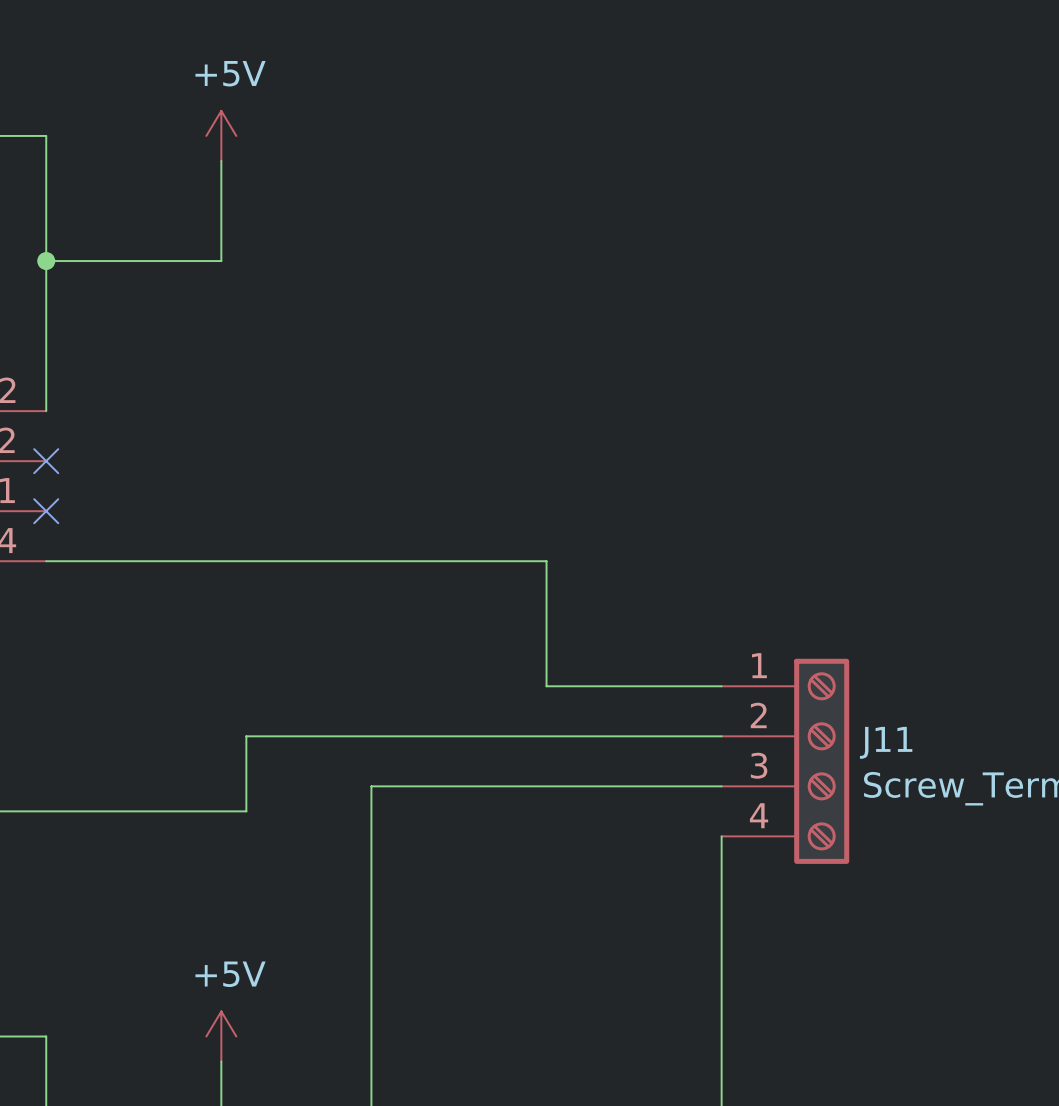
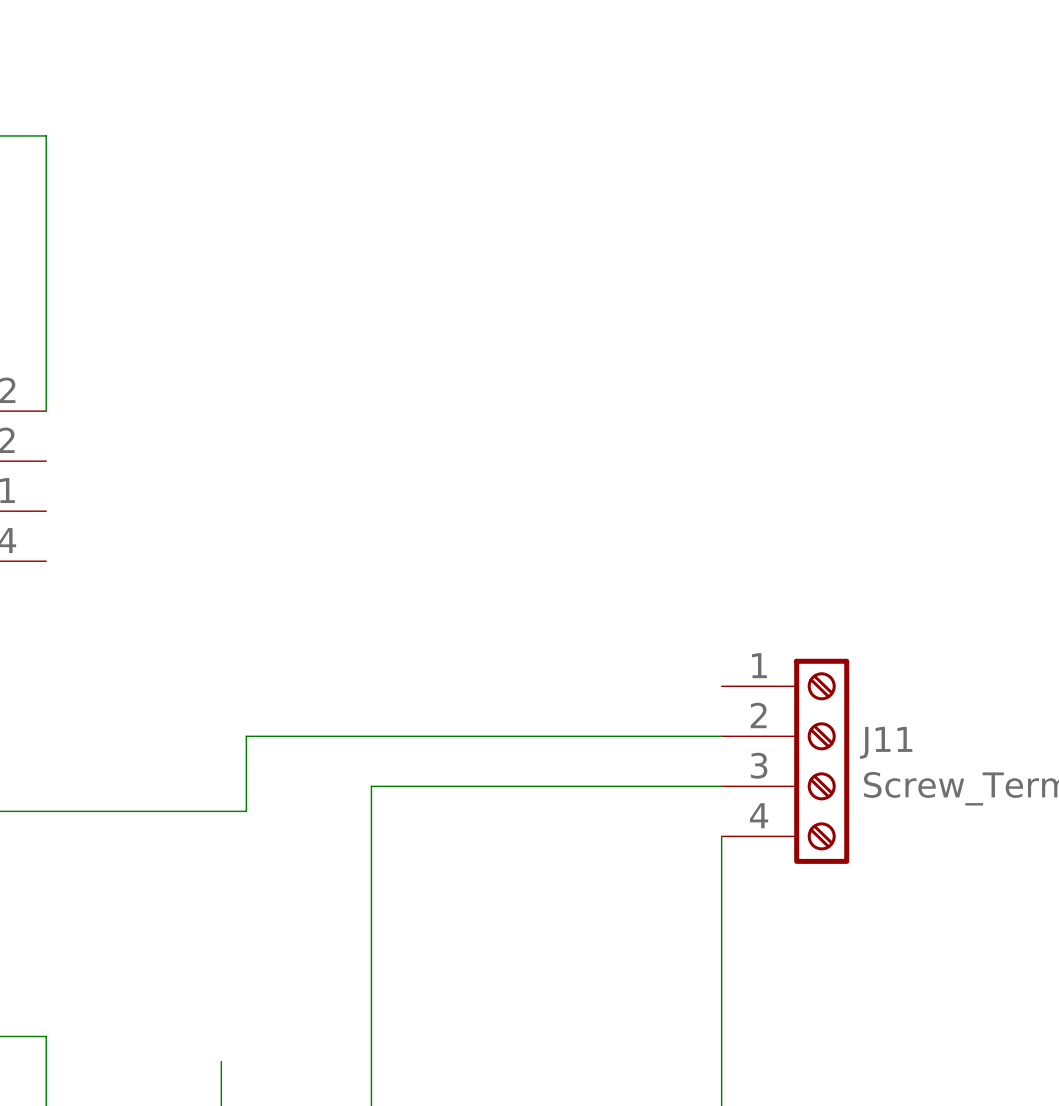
power symbol: +5V (221, 135) -> none
wire: (221, 160) (221, 261) (46, 261) -> none
junction: (46, 261) -> none
no-connect mark: (46, 461) -> none
no-connect mark: (46, 511) -> none
wire: (46, 561) (546, 561) (546, 686) (721, 686) -> none
power symbol: +5V (221, 1036) -> none

